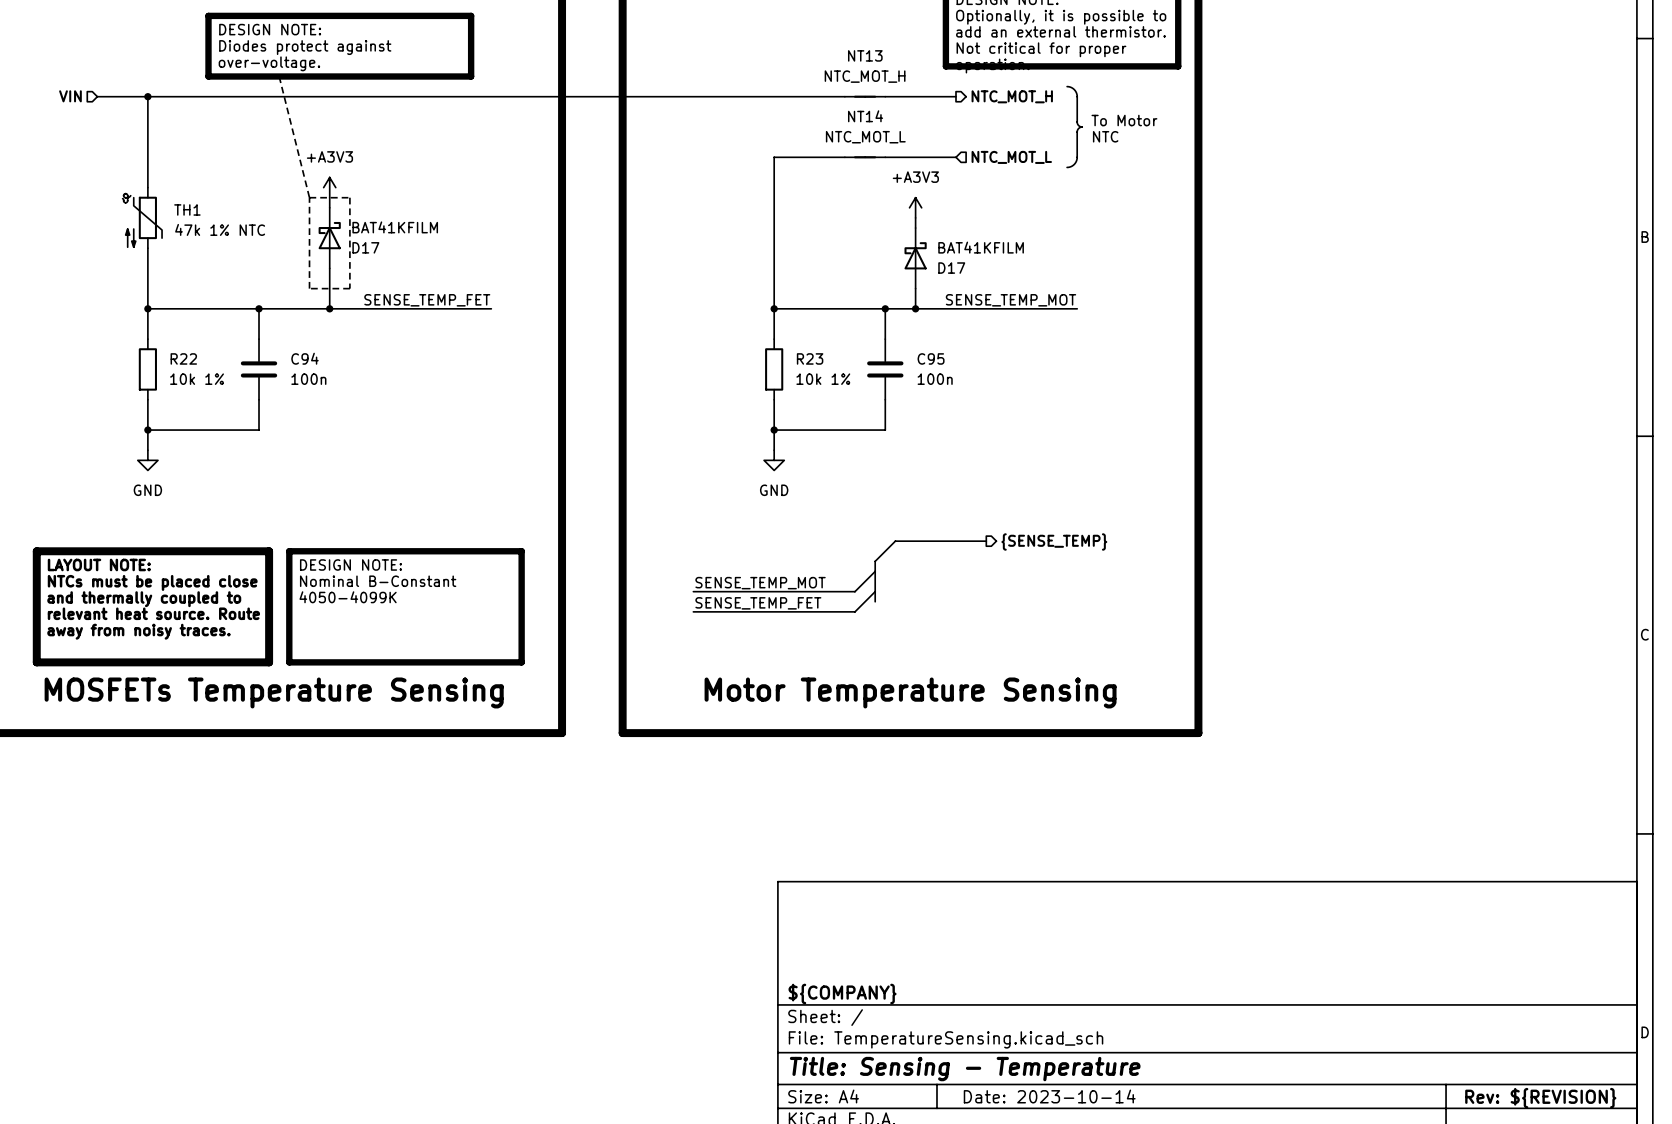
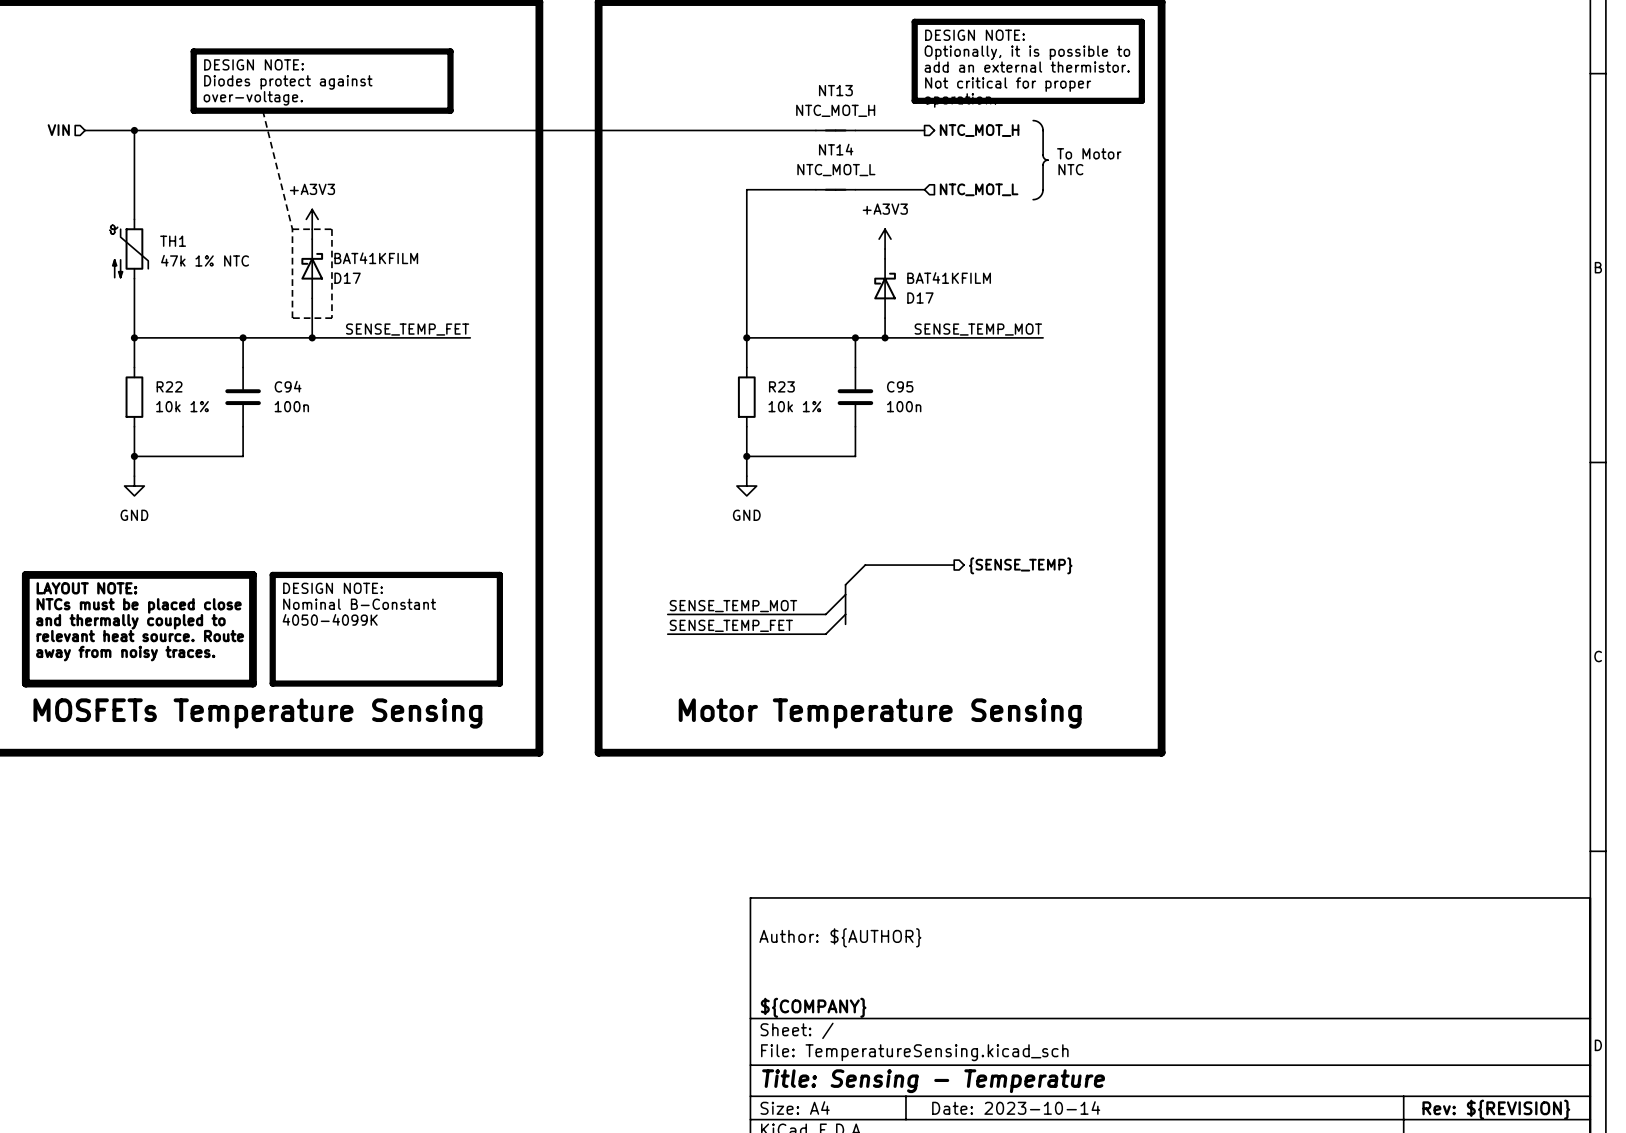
title block: none -> Author: ${AUTHOR} (840, 937)

